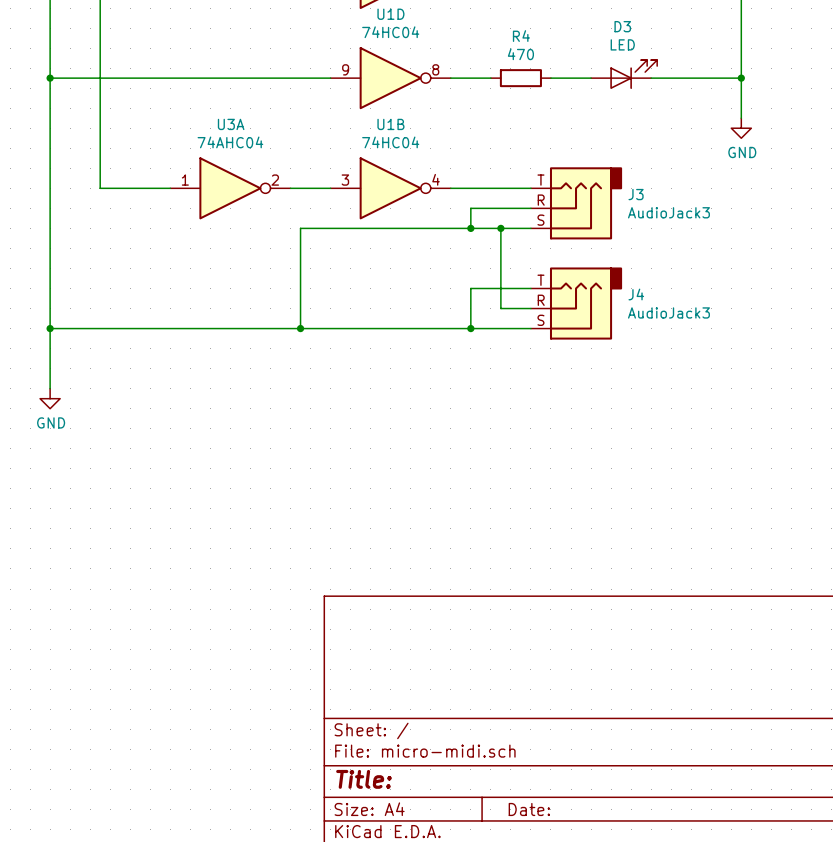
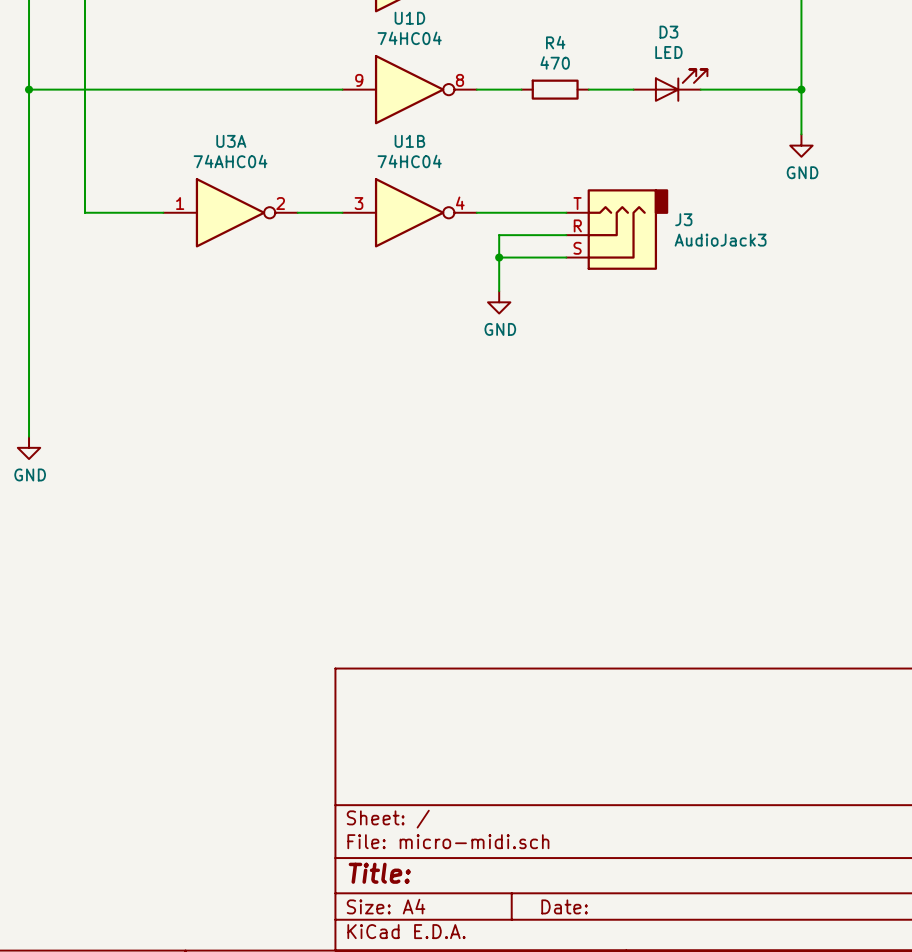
wire: (470, 228) (300, 228) (300, 328) -> (499, 257) (499, 291)
wire: (500, 228) (500, 308) (530, 308) -> none
junction: (500, 228) -> none
power symbol: none -> GND (499, 302)
wire: (530, 288) (470, 288) (470, 328) -> none
J4: AudioJack3 (576, 303) -> none
wire: (50, 328) (530, 328) -> none
junction: (50, 328) -> none
junction: (300, 328) -> none
junction: (470, 328) -> none

